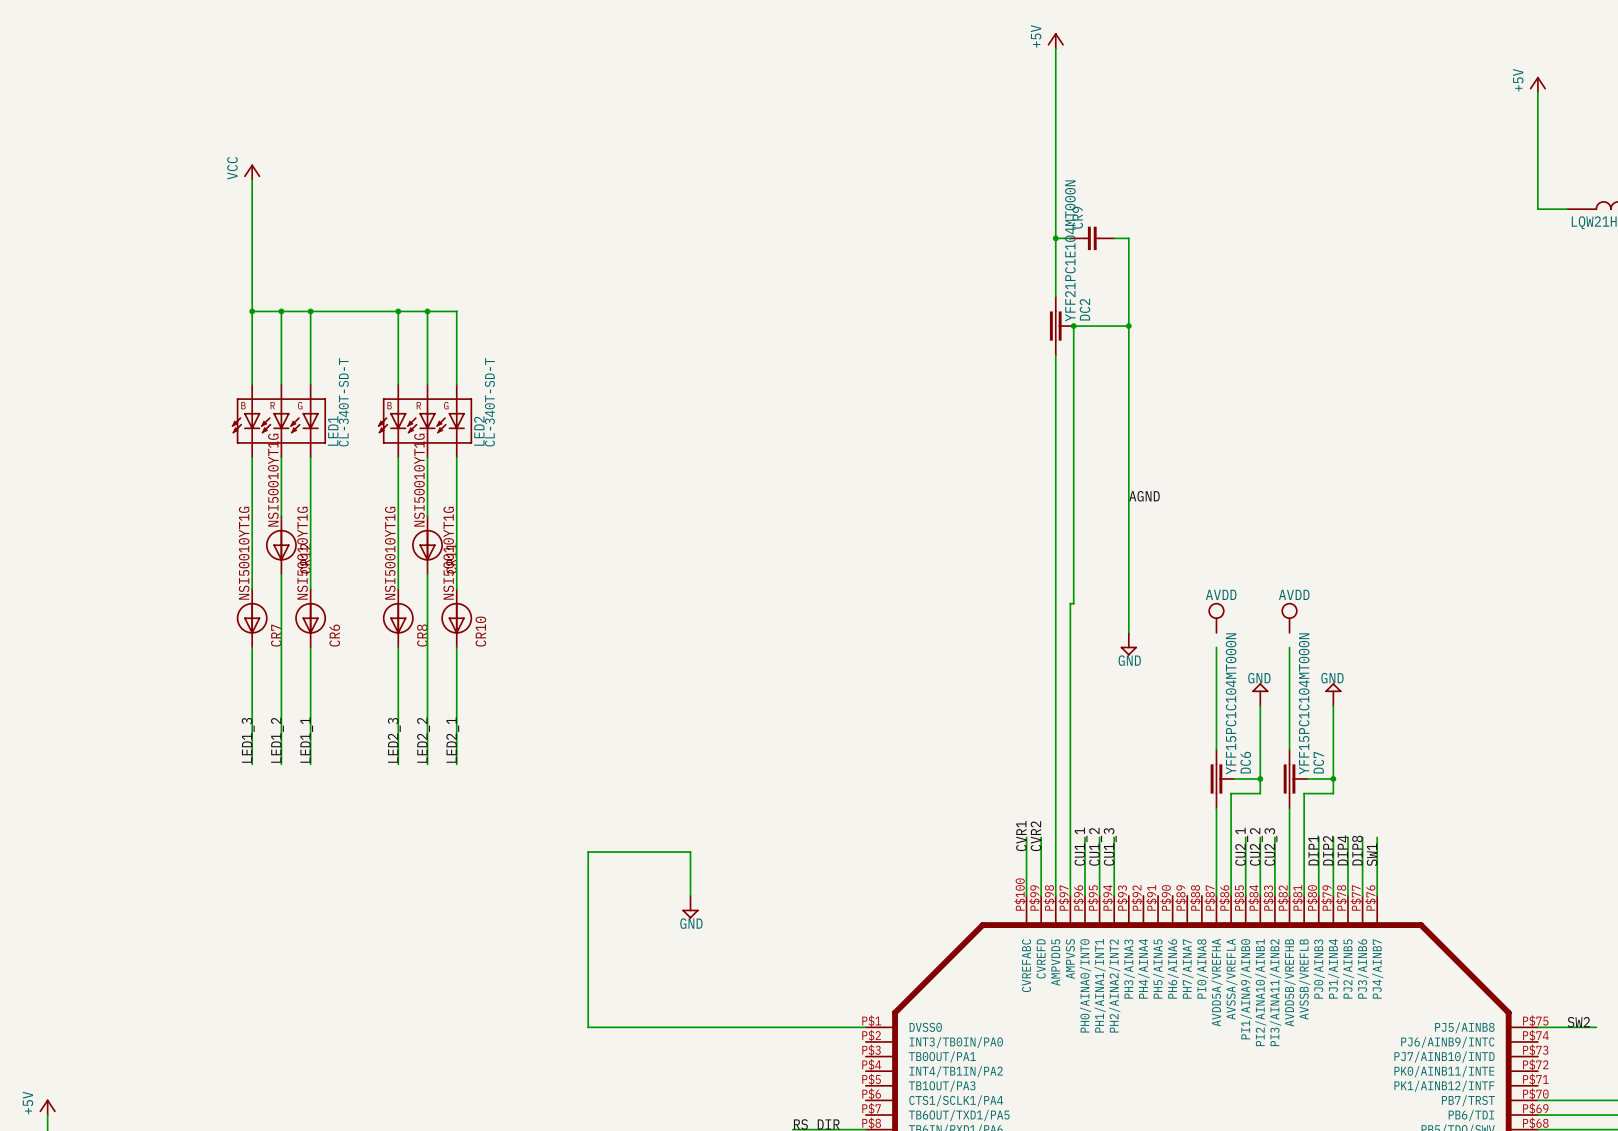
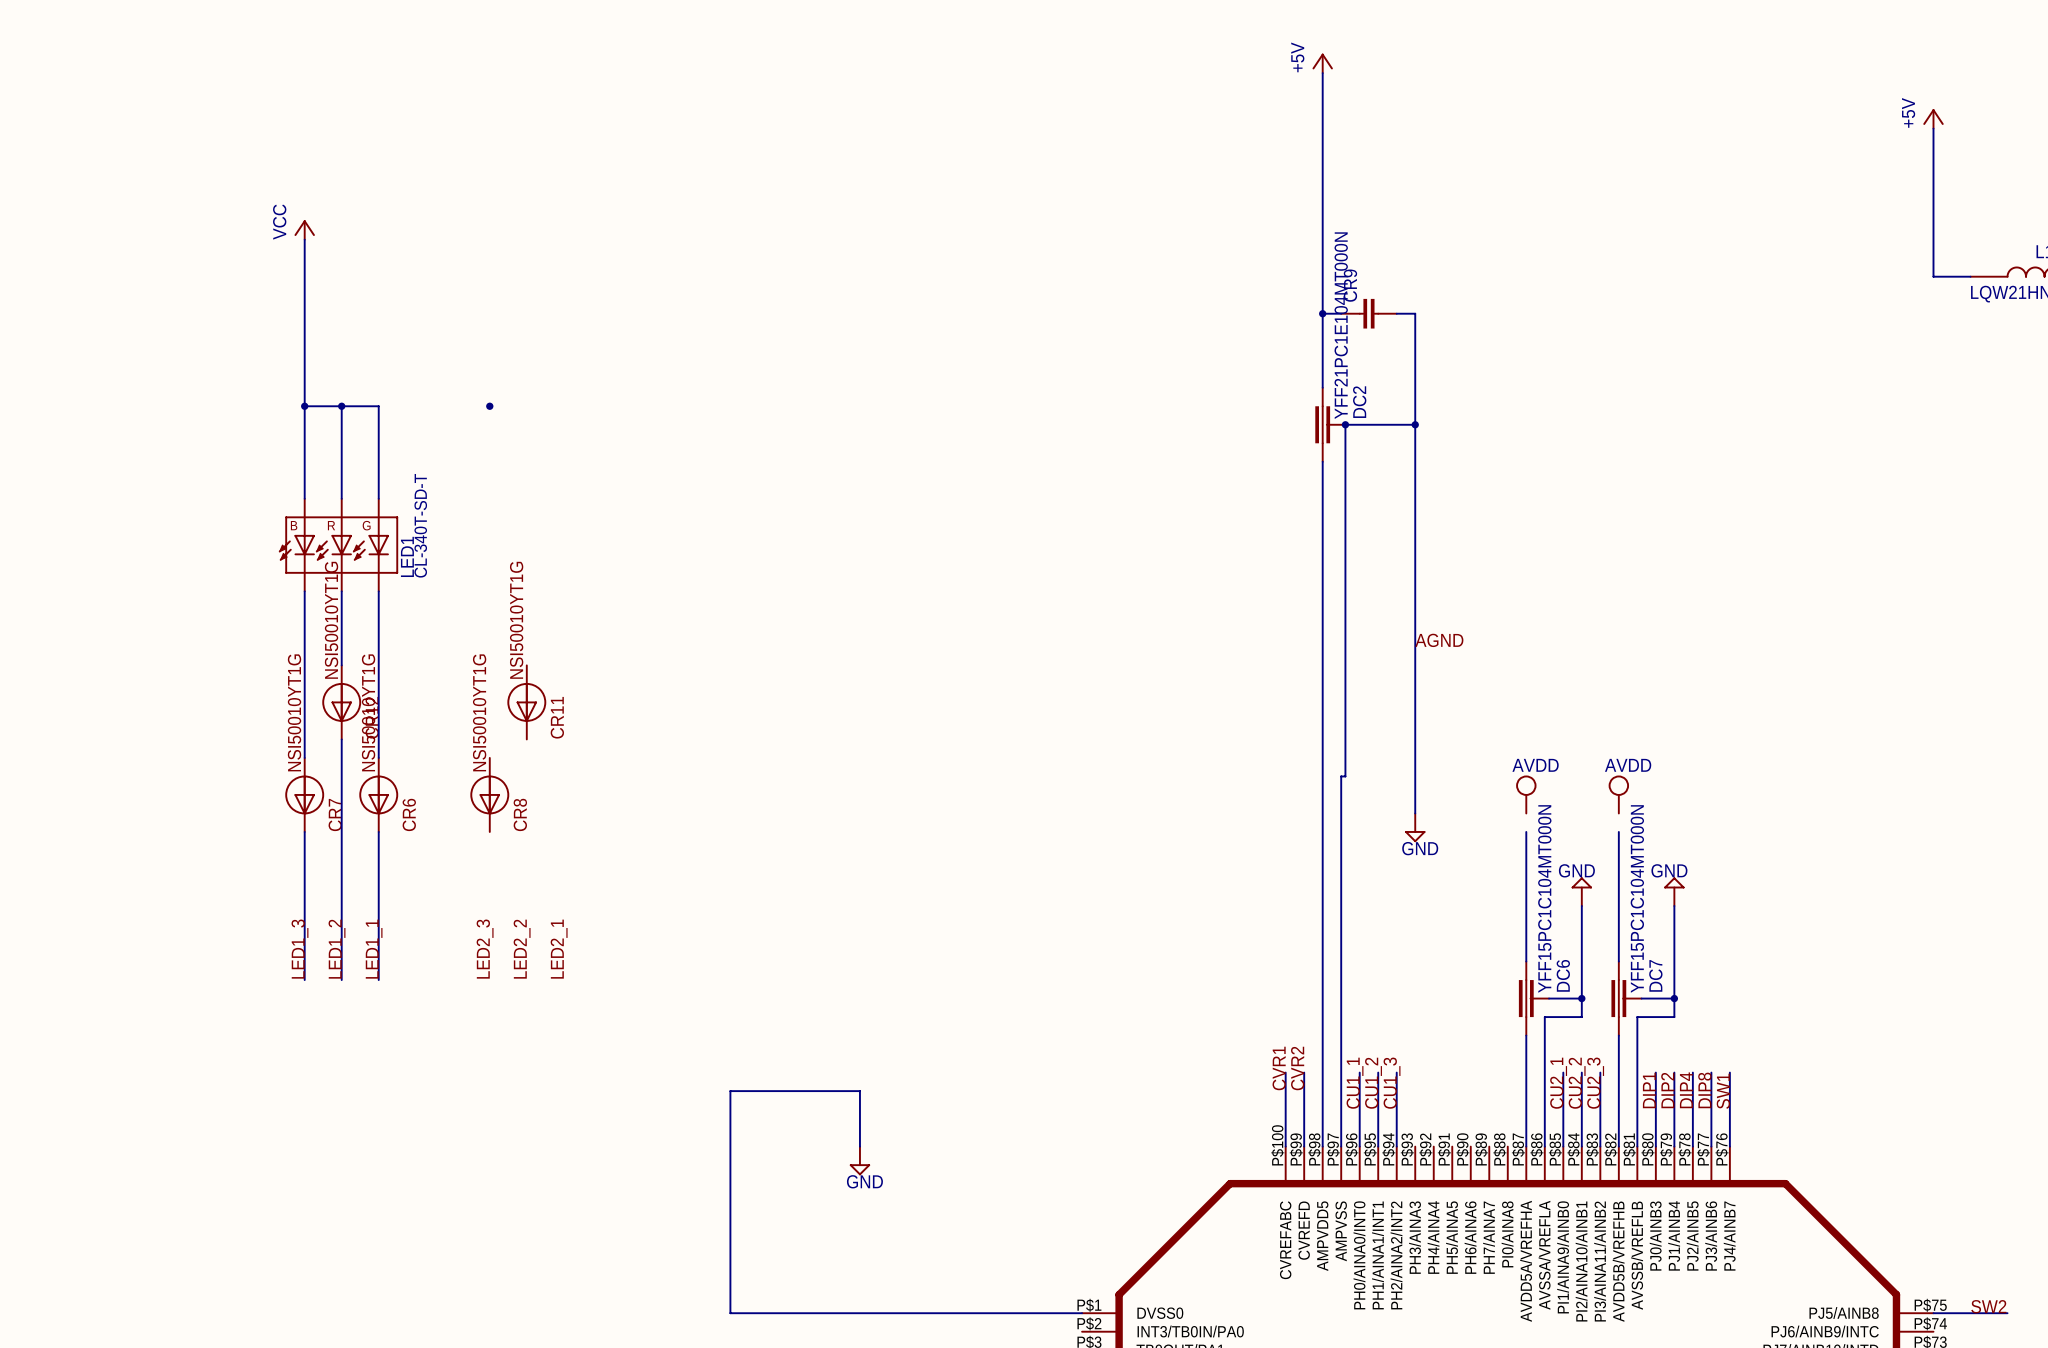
wire: (310, 311) (456, 311) (456, 384) -> none
junction: (310, 311) -> none
wire: (398, 311) (398, 384) -> none
wire: (427, 311) (427, 384) -> none
junction: (427, 311) -> none
LED2: CL-340T-SD-T (425, 421) -> none
wire: (398, 457) (398, 589) -> none
wire: (427, 457) (427, 515) -> none
wire: (456, 457) (456, 589) -> none
wire: (427, 574) (427, 764) -> none
CR10: NSI50010YT1G (456, 618) -> none
wire: (398, 647) (398, 764) -> none
wire: (456, 647) (456, 764) -> none

